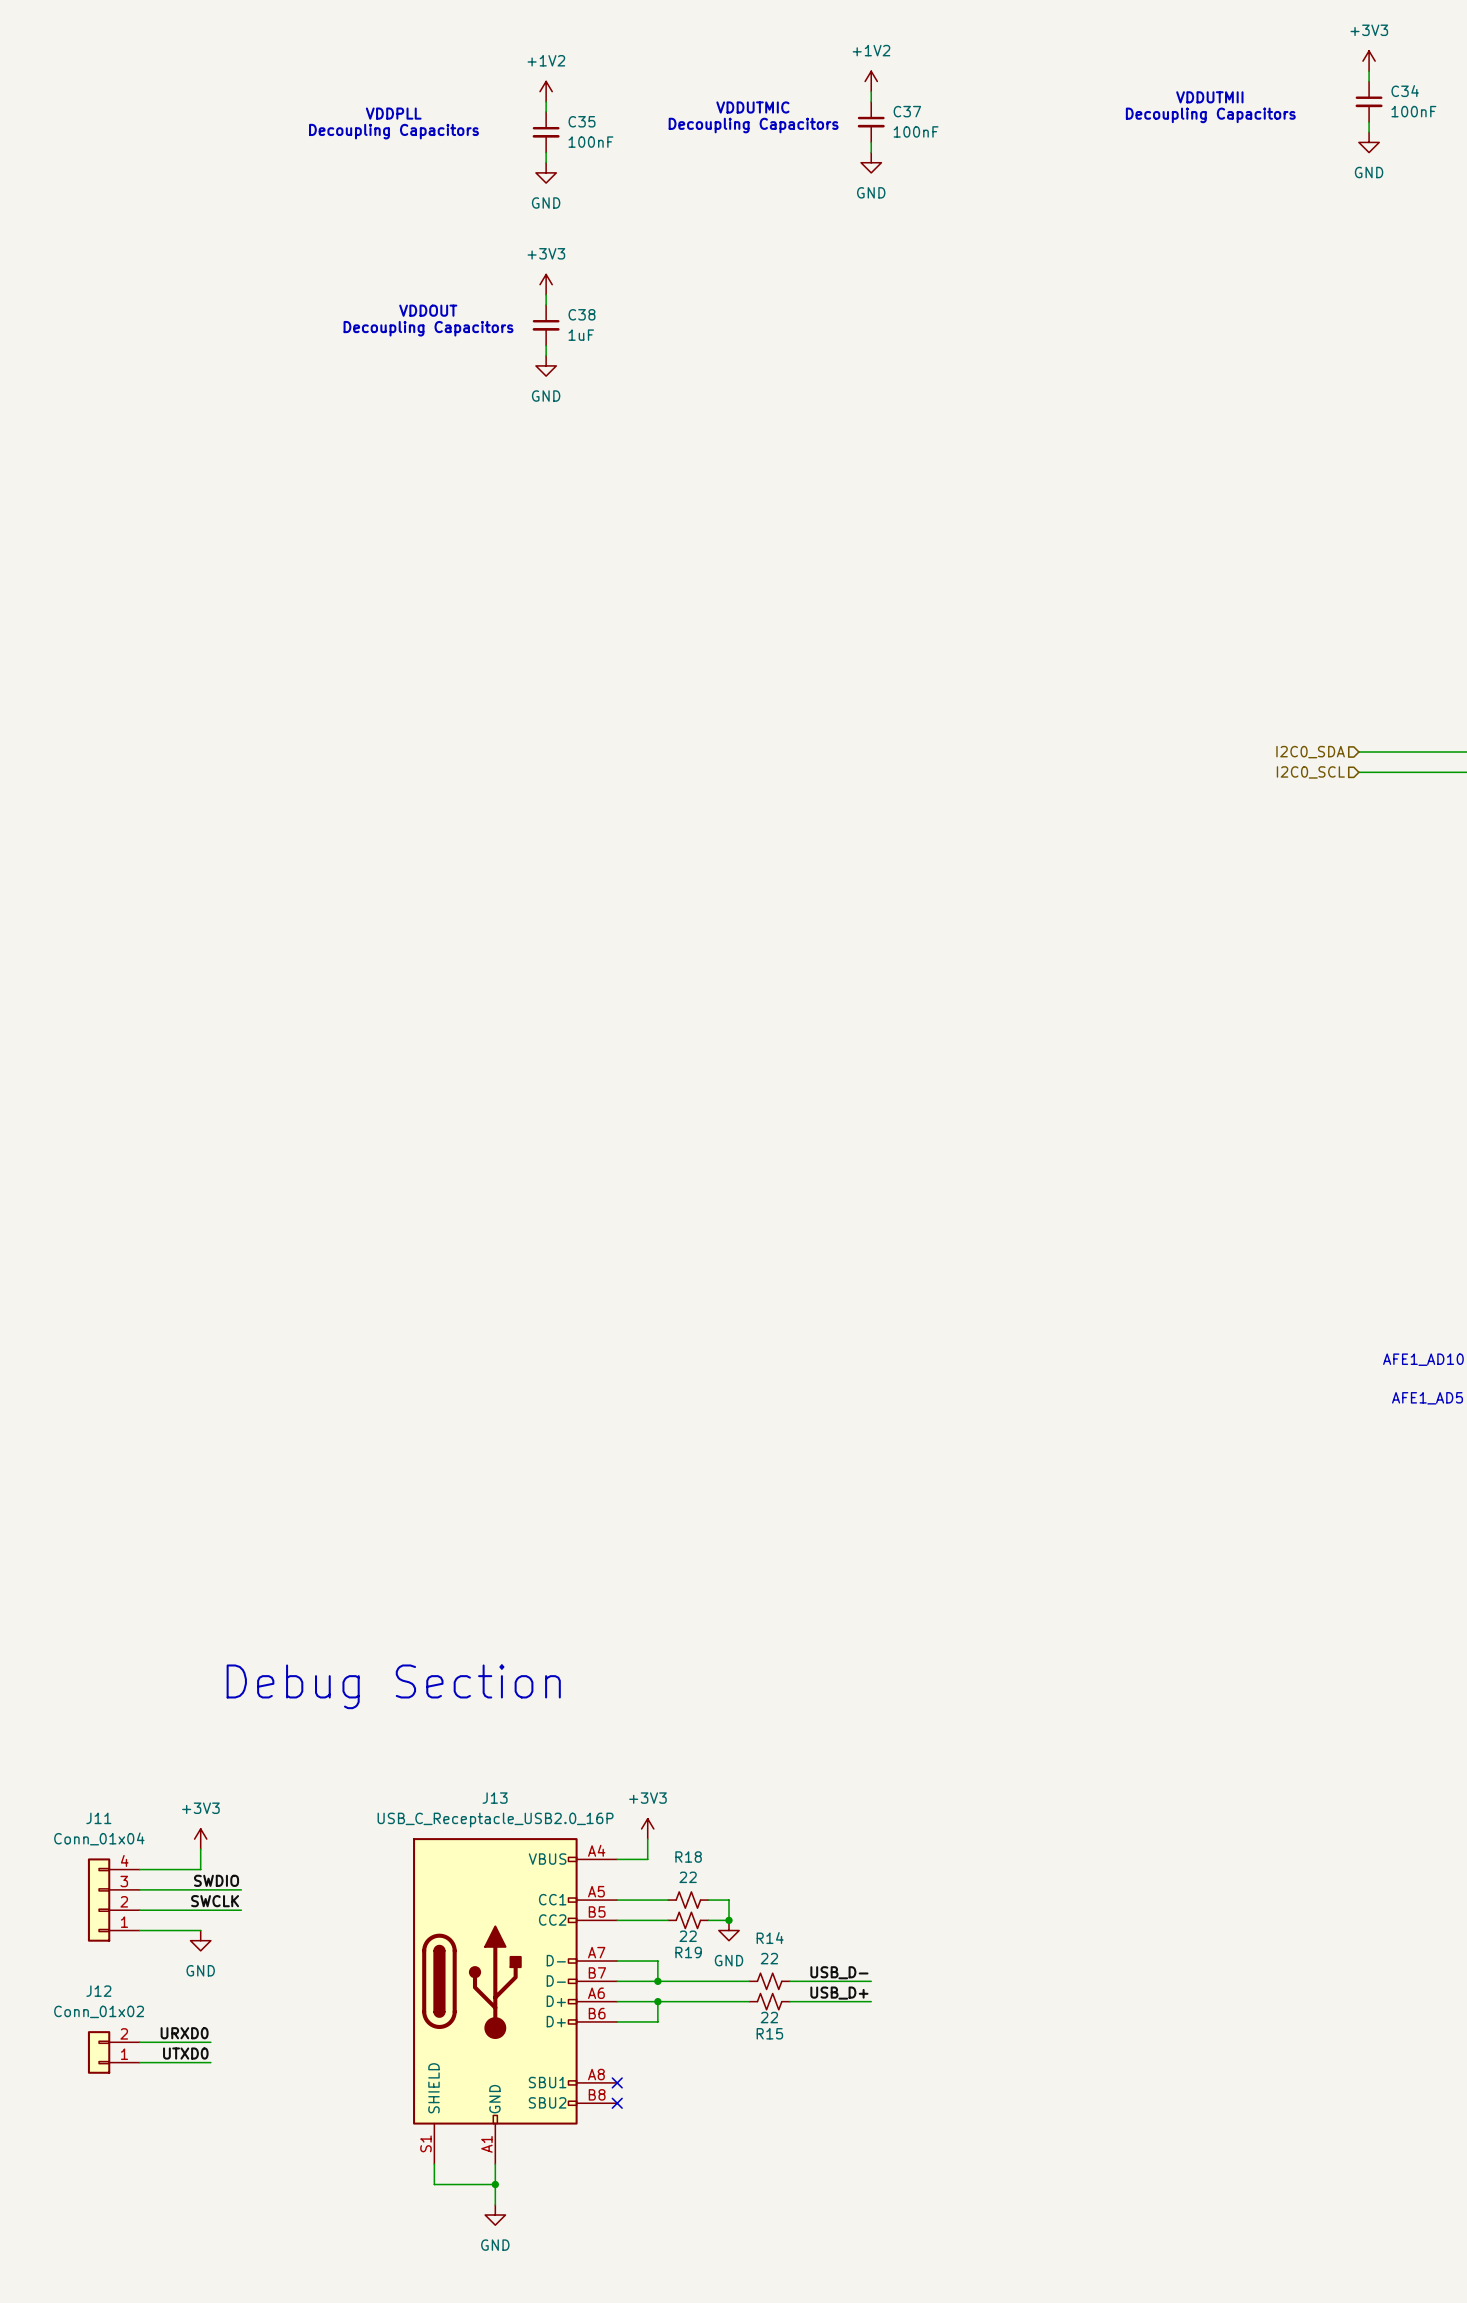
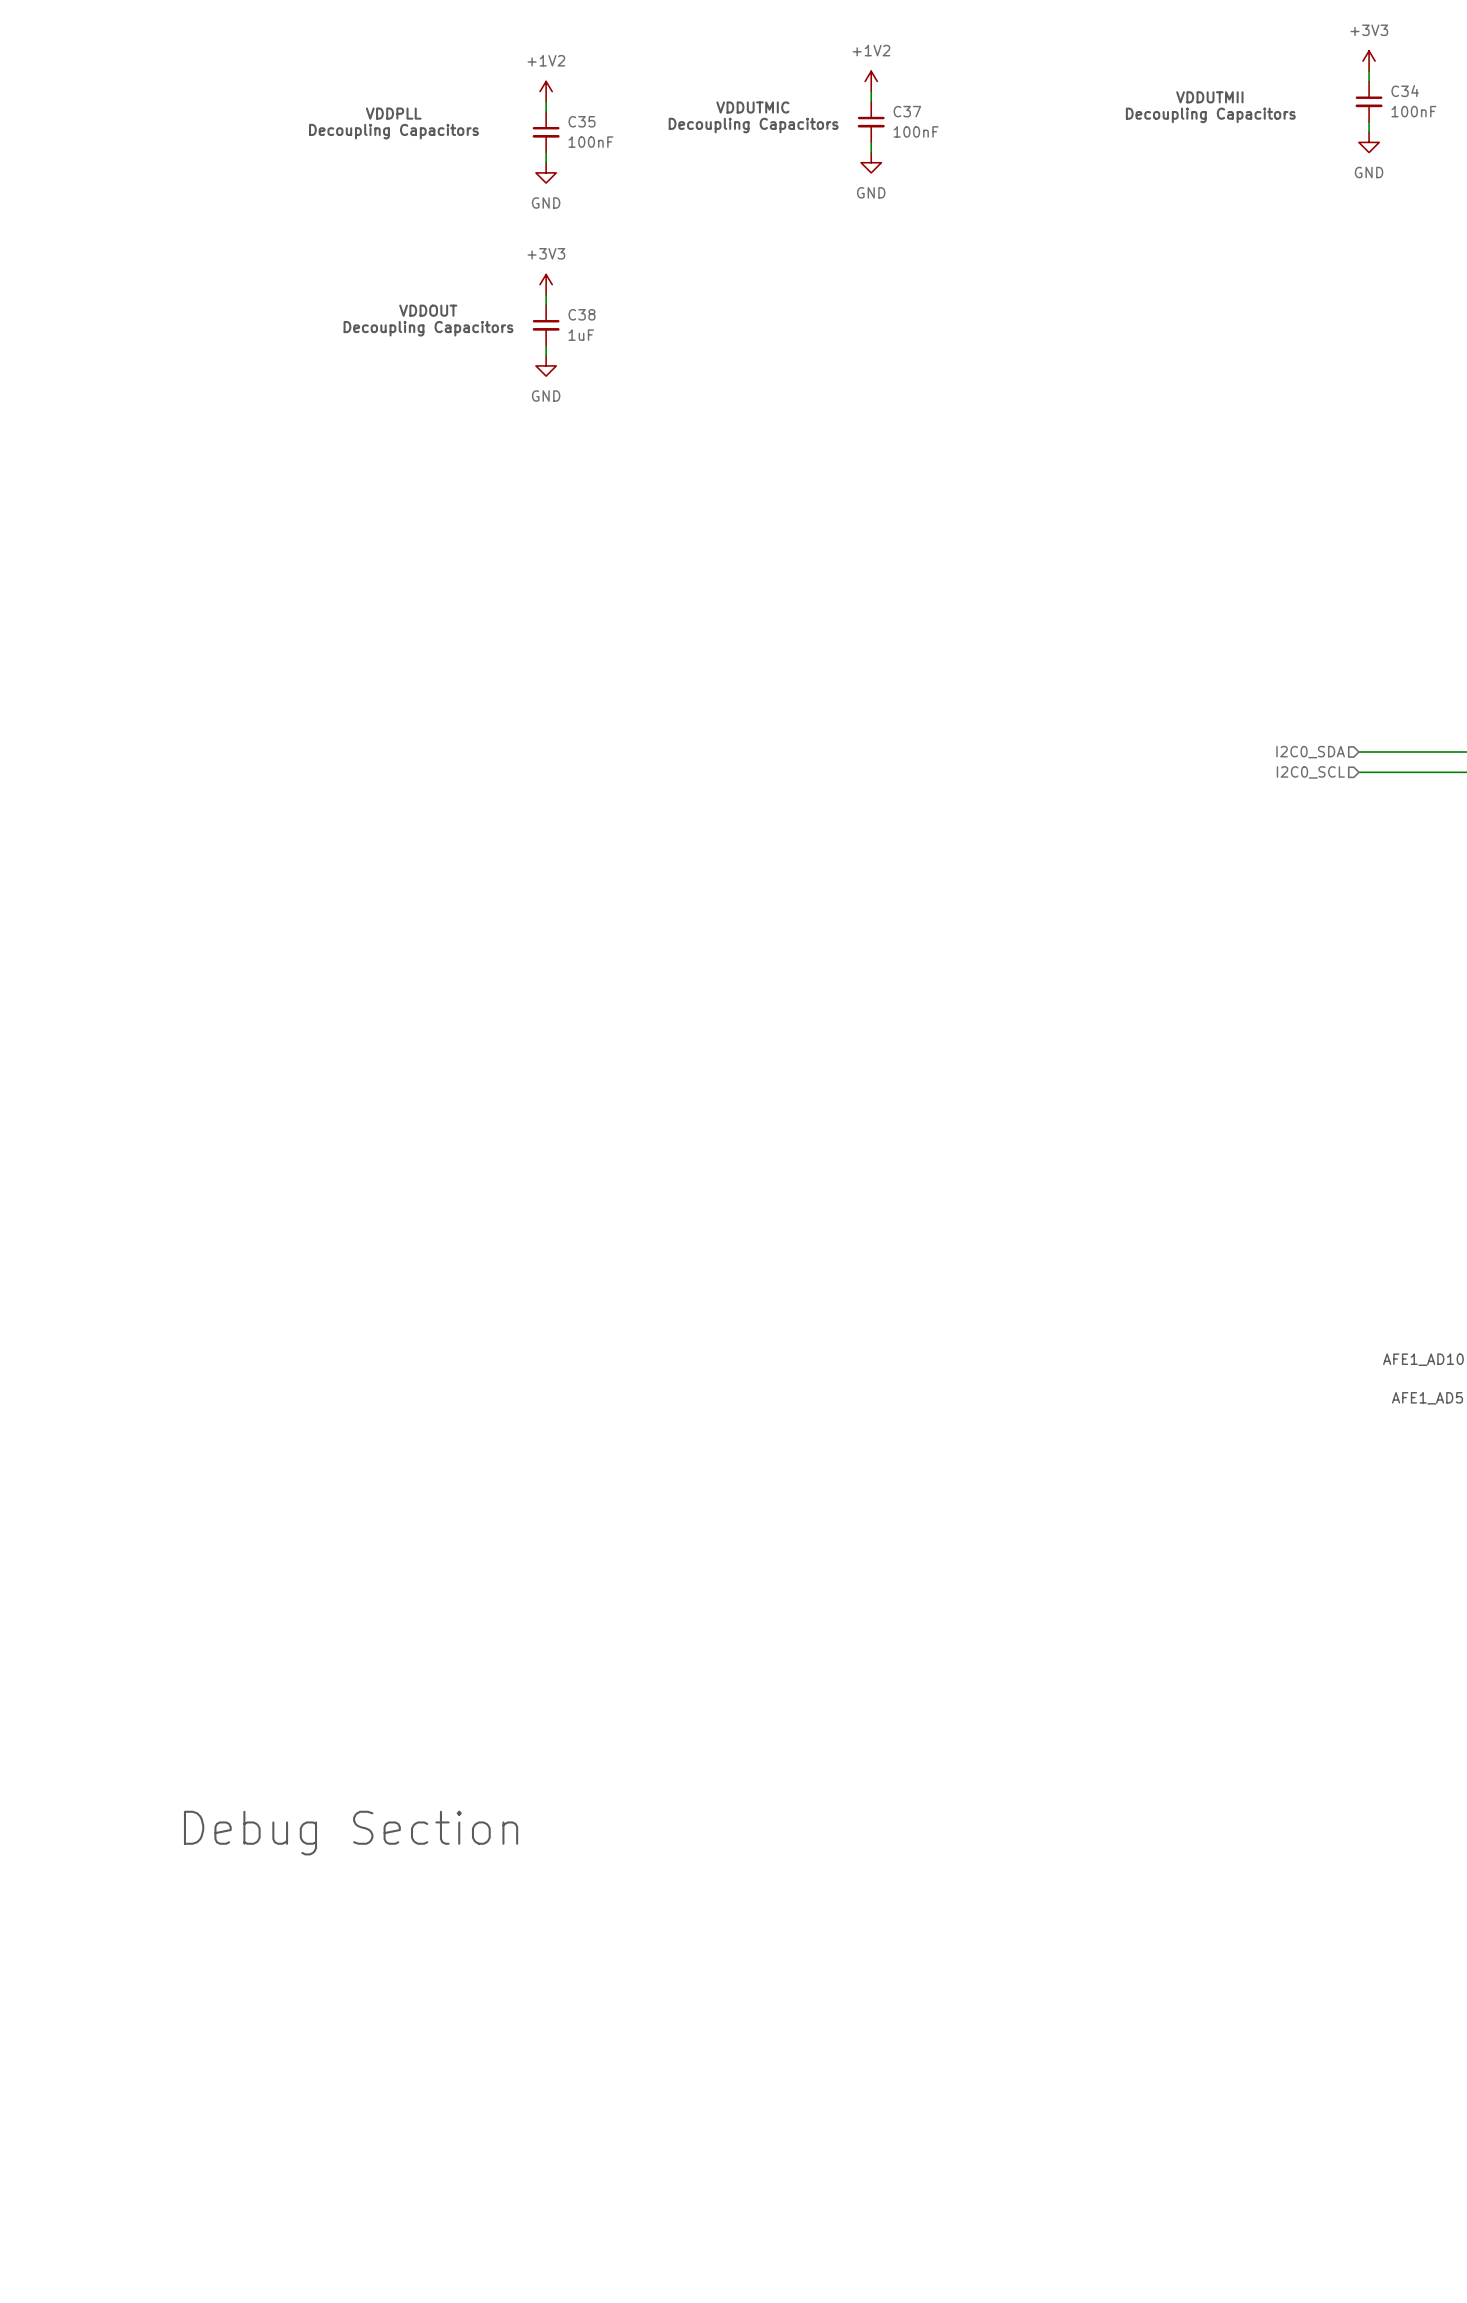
text position: Debug Section (393, 1686) -> Debug Section (351, 1833)
power symbol: +3V3 (647, 1828) -> none
power symbol: +3V3 (200, 1839) -> none
wire: (647, 1839) (647, 1859) (617, 1859) -> none
wire: (200, 1849) (200, 1869) (139, 1869) -> none
label: SWDIO (216, 1880) -> none
wire: (139, 1889) (241, 1889) -> none
J11: Conn_01x04 (113, 1900) -> none
wire: (617, 1900) (668, 1900) -> none
R18: 22 (688, 1900) -> none
wire: (708, 1900) (729, 1900) (729, 1920) (708, 1920) -> none
label: SWCLK (215, 1901) -> none
wire: (139, 1910) (241, 1910) -> none
wire: (617, 1920) (668, 1920) -> none
R19: 22 (688, 1920) -> none
junction: (729, 1920) -> none
wire: (139, 1930) (200, 1930) -> none
power symbol: GND (729, 1930) -> none
power symbol: GND (200, 1940) -> none
wire: (617, 1961) (657, 1961) (657, 1981) -> none
label: USB_D- (839, 1972) -> none
wire: (617, 1981) (749, 1981) -> none
junction: (657, 1981) -> none
R14: 22 (769, 1981) -> none
wire: (789, 1981) (871, 1981) -> none
label: USB_D+ (839, 1993) -> none
J13: USB_C_Receptacle_USB2.0_16P (515, 2001) -> none
wire: (617, 2001) (749, 2001) -> none
wire: (657, 2001) (657, 2021) (617, 2021) -> none
junction: (657, 2001) -> none
R15: 22 (769, 2001) -> none
wire: (789, 2001) (871, 2001) -> none
label: URXD0 (184, 2033) -> none
wire: (139, 2042) (210, 2042) -> none
J12: Conn_01x02 (113, 2052) -> none
label: UTXD0 (185, 2053) -> none
wire: (139, 2062) (210, 2062) -> none
no-connect mark: (617, 2082) -> none
no-connect mark: (617, 2103) -> none
wire: (434, 2164) (434, 2184) (495, 2184) -> none
wire: (495, 2164) (495, 2204) -> none
junction: (495, 2184) -> none
power symbol: GND (495, 2215) -> none

